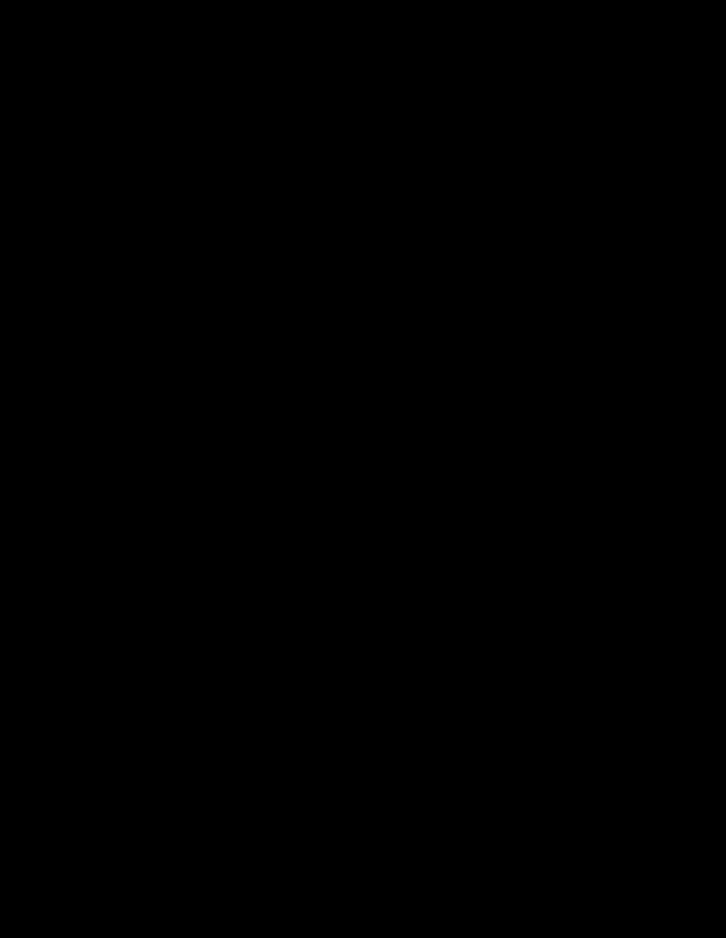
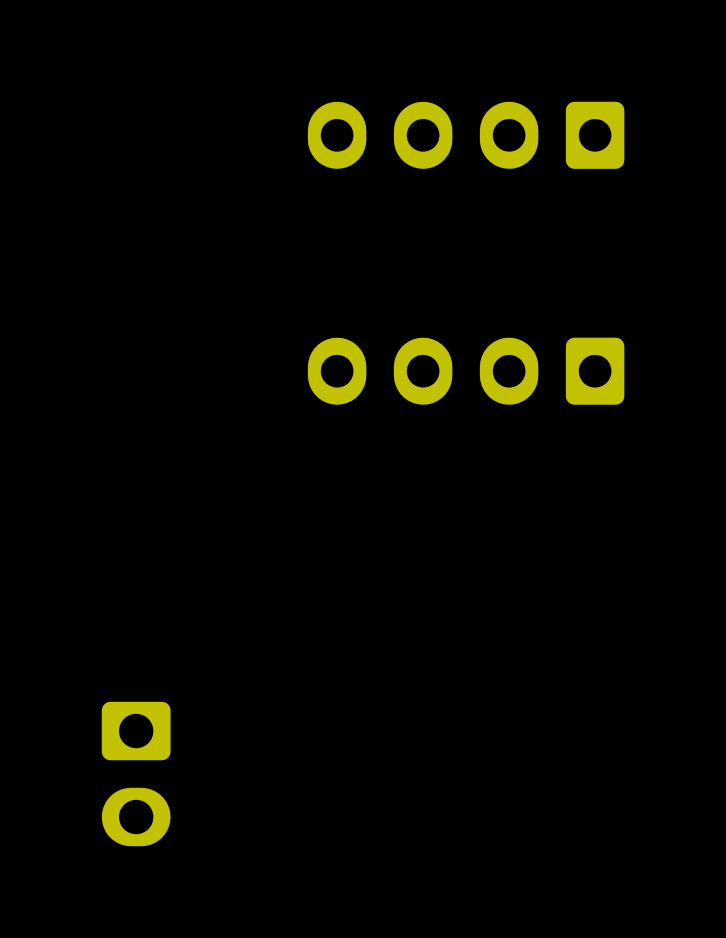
part: none -> (466, 135)
part: none -> (466, 371)
part: none -> (136, 774)

